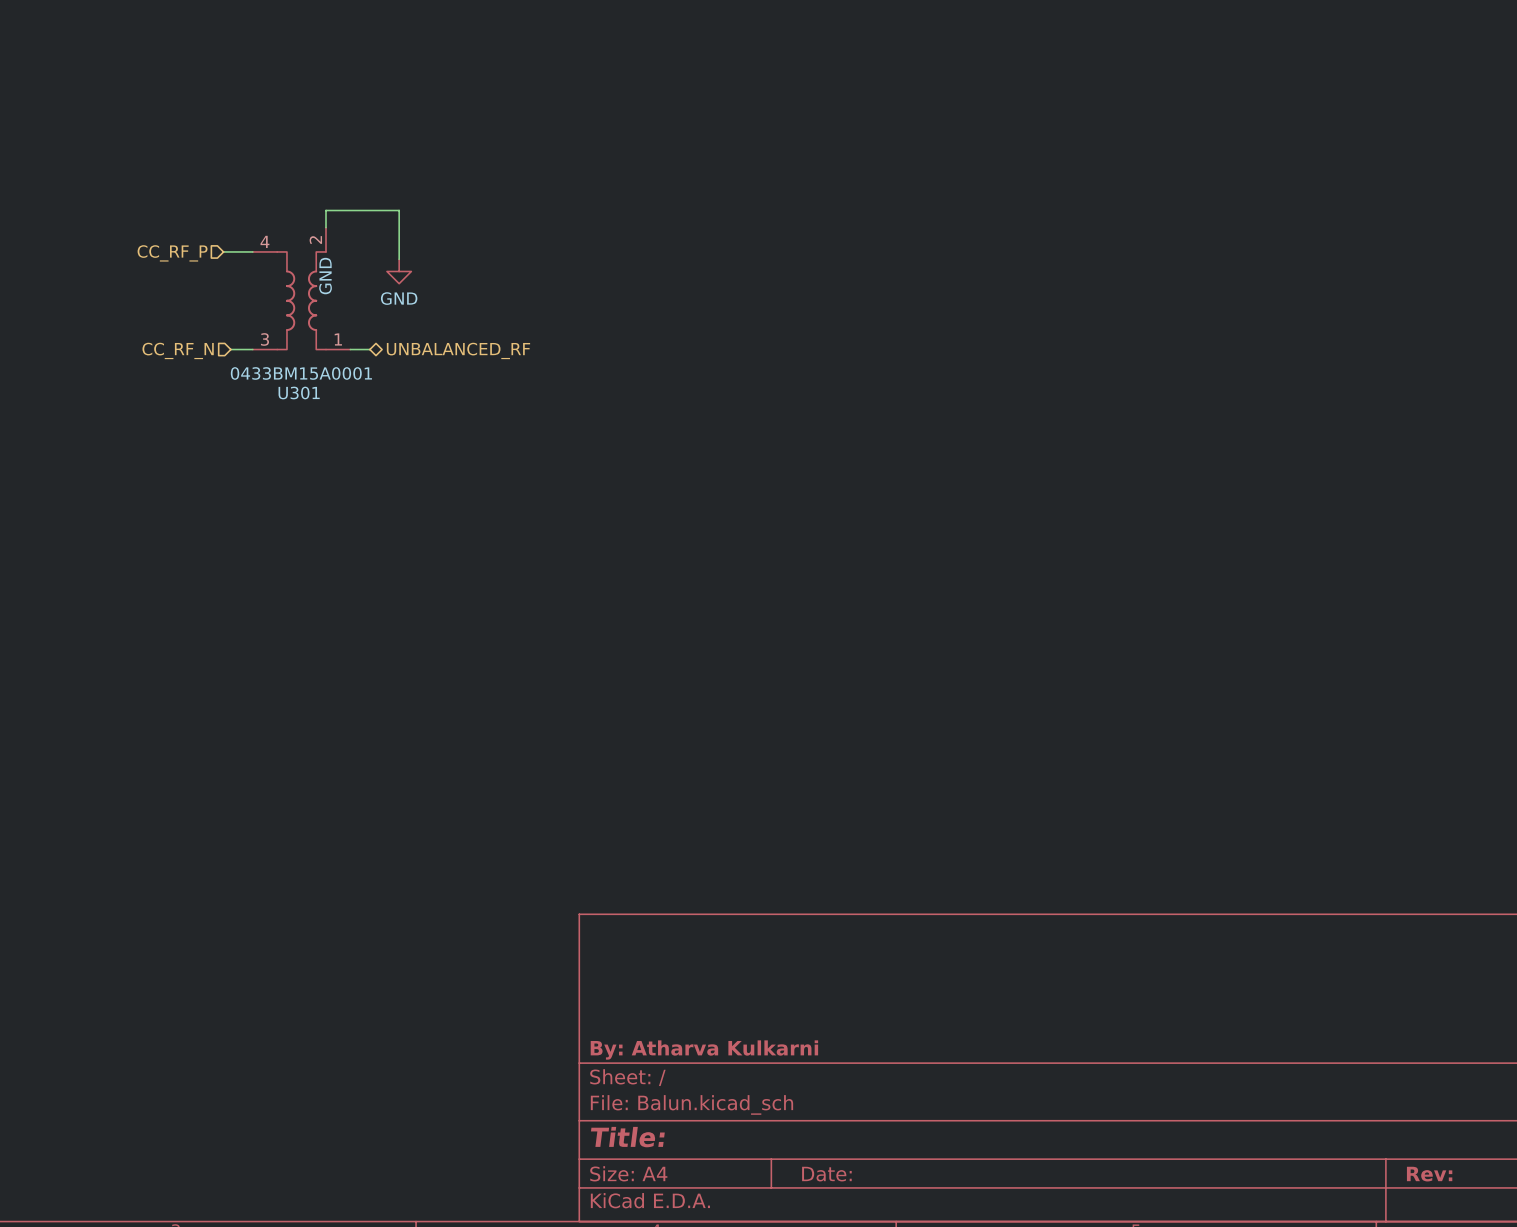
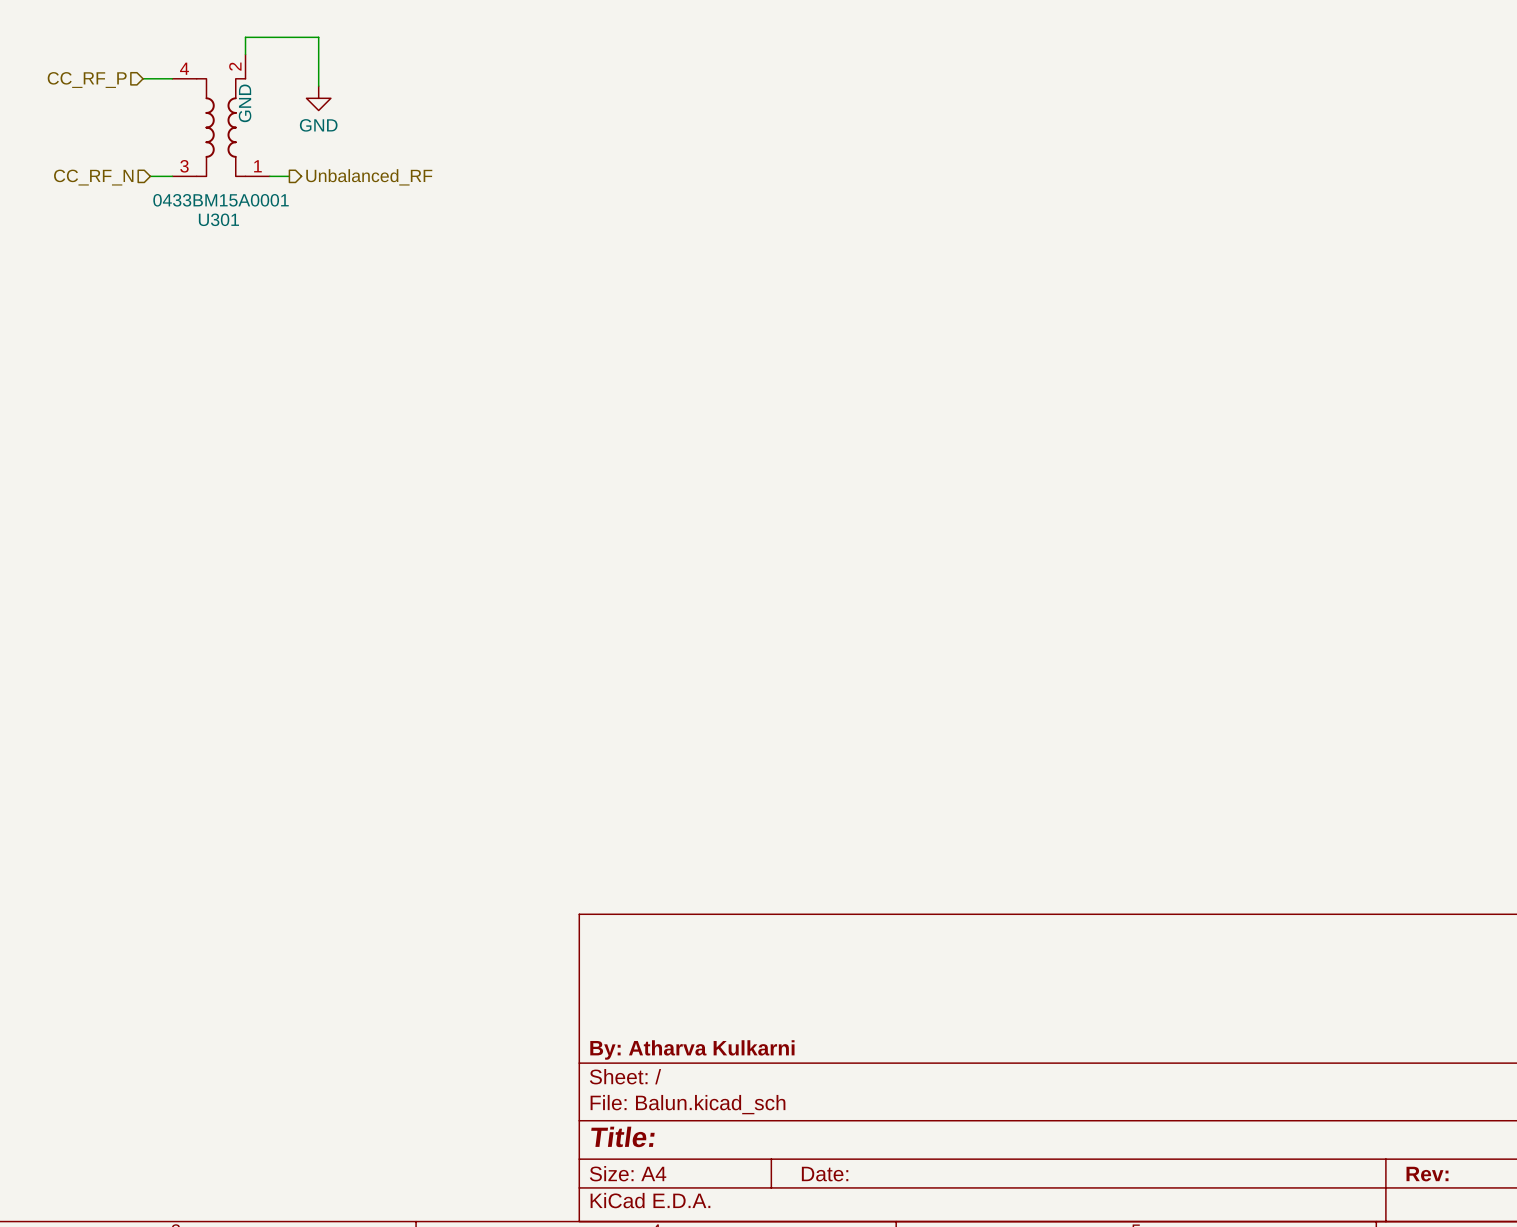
hierarchical label: none -> Unbalanced_RF (369, 177)
wire: (326, 227) (326, 210) (399, 210) (399, 259) -> (245, 54) (245, 37) (318, 37) (318, 86)
wire: (223, 251) (252, 251) -> (143, 78) (172, 78)
hierarchical label position: CC_RF_P (172, 253) -> CC_RF_P (87, 80)
power symbol position: GND (399, 271) -> GND (318, 98)
U301 position: (301, 288) -> (221, 115)
wire: (230, 349) (252, 349) -> (150, 176) (172, 176)
wire: (350, 349) (369, 349) -> (269, 176) (289, 176)
hierarchical label position: CC_RF_N (178, 350) -> CC_RF_N (93, 177)
hierarchical label: UNBALANCED_RF (458, 350) -> none

